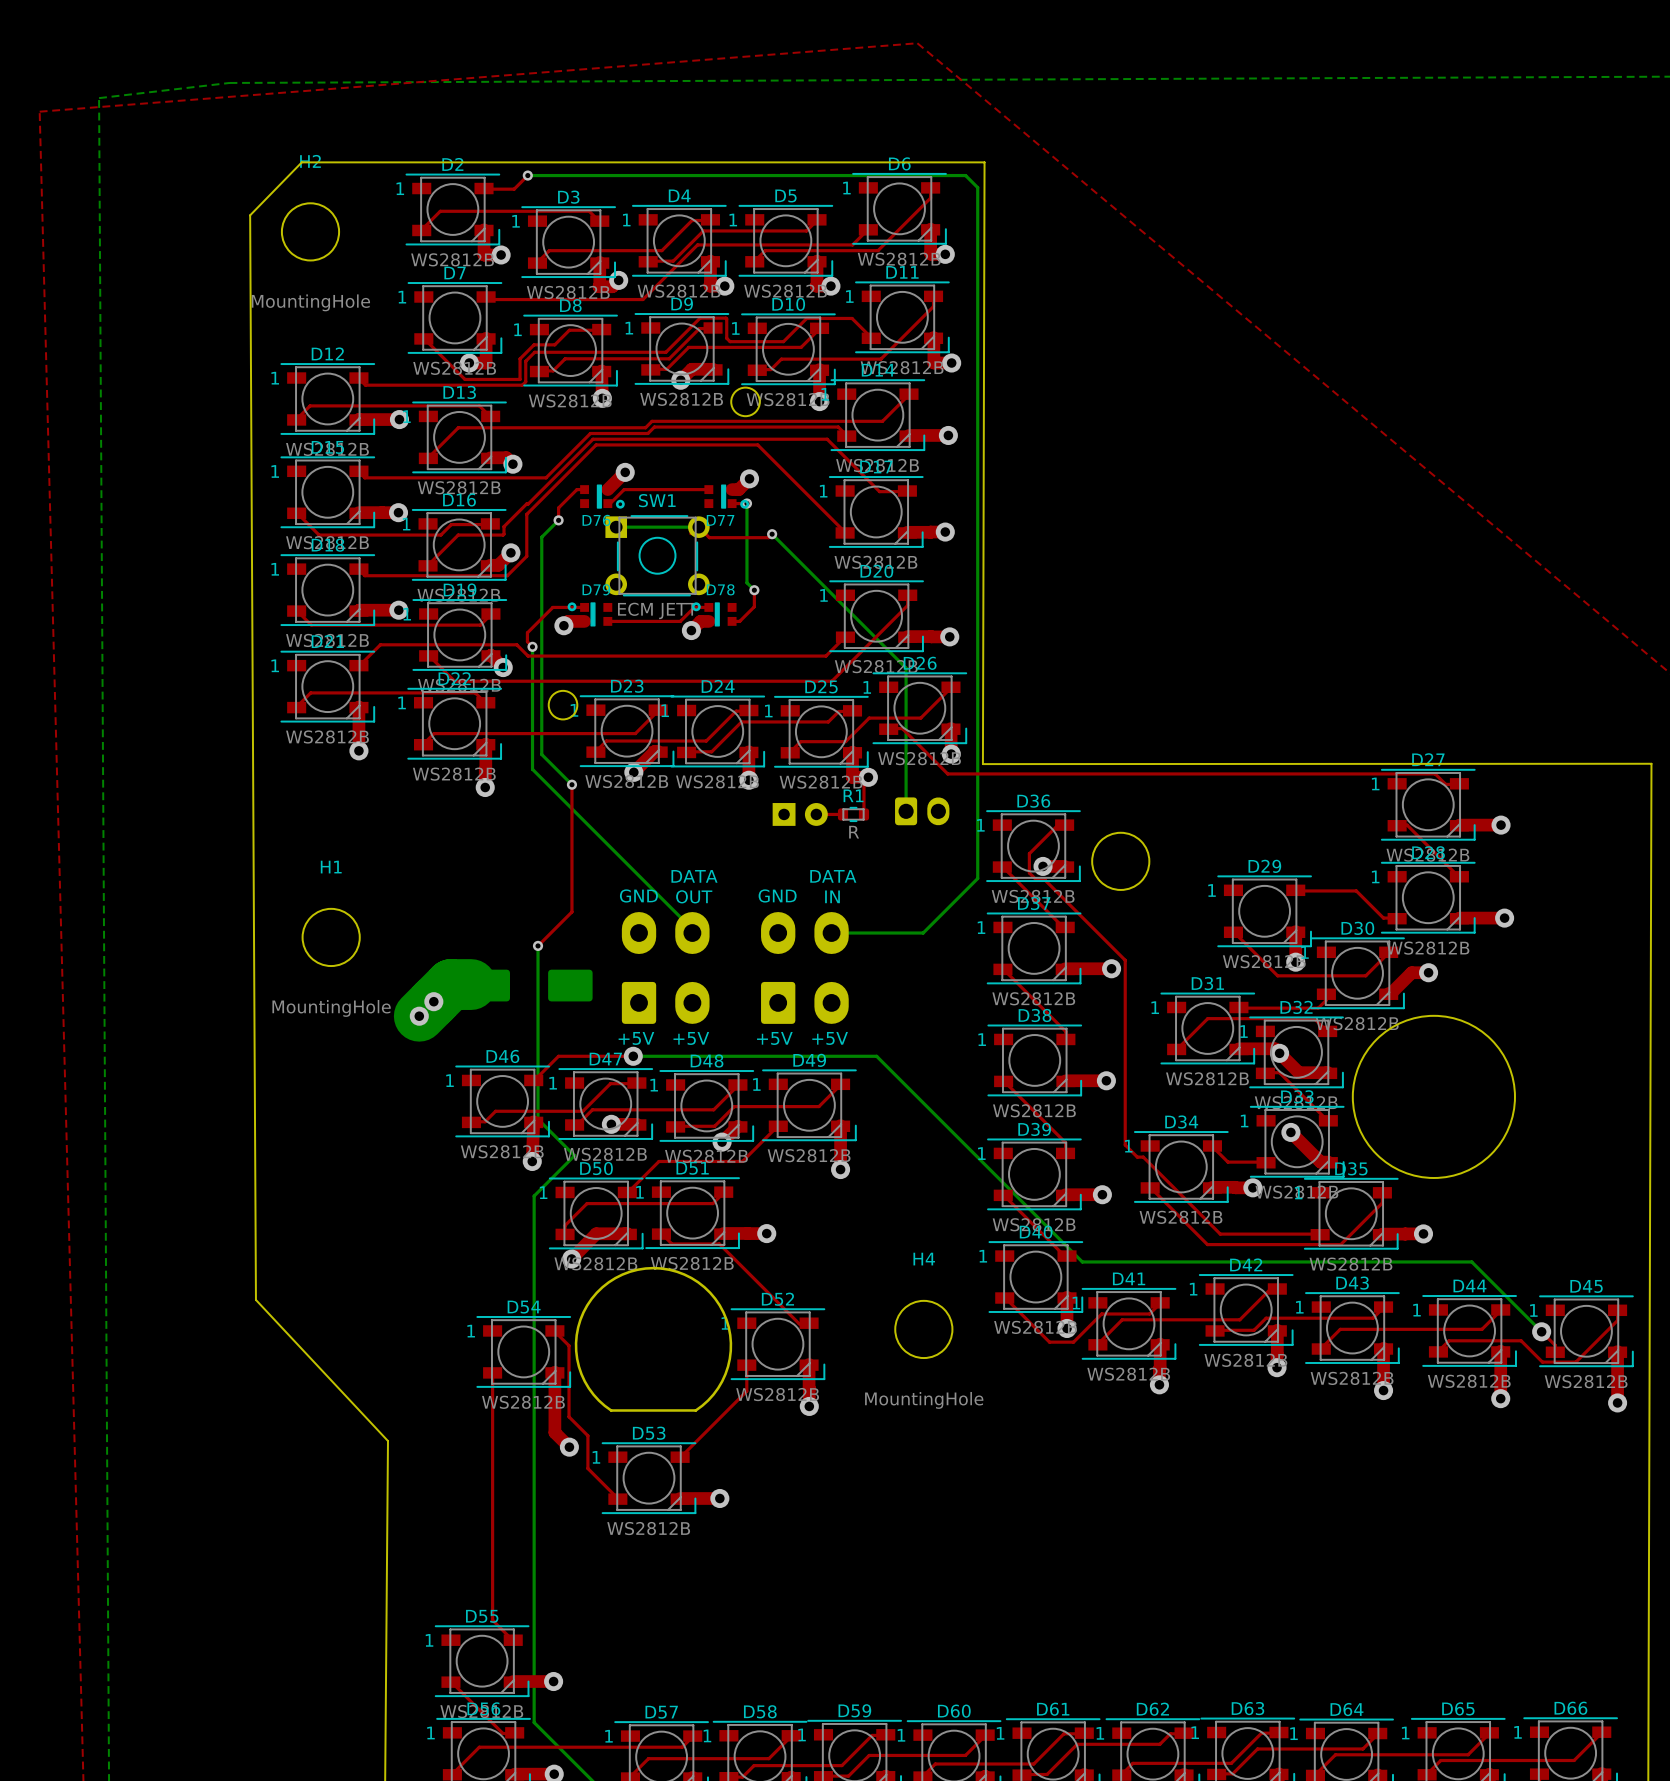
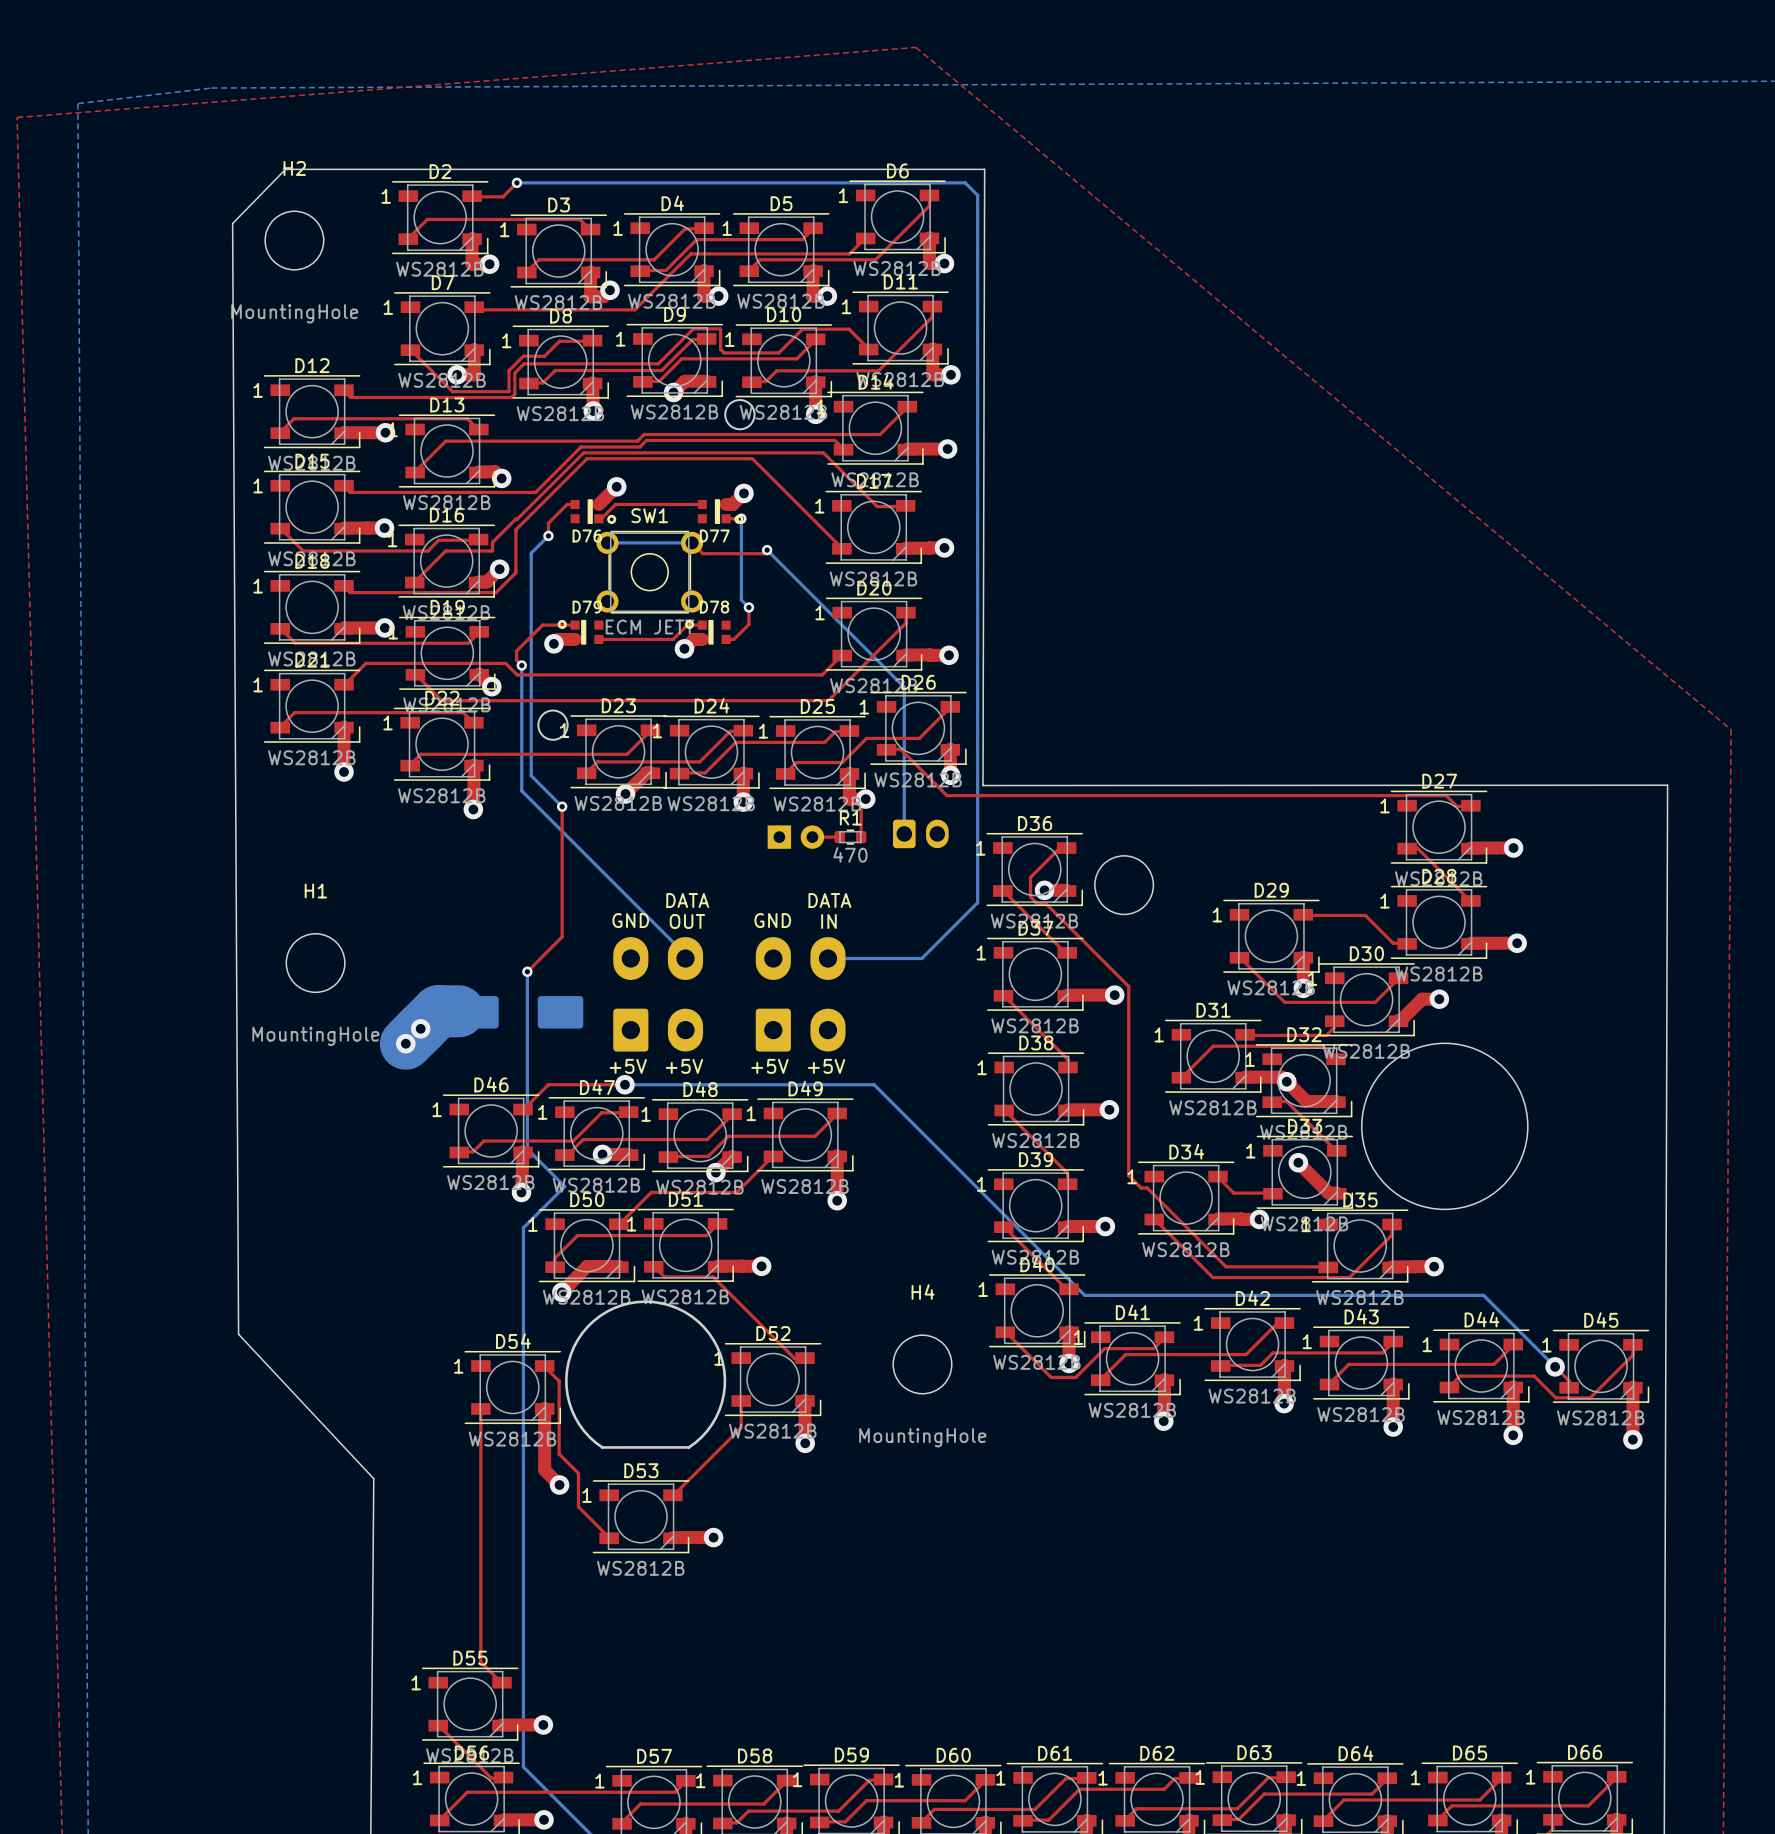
SW1 footprint: [605, 515, 710, 597] -> [596, 530, 704, 614]
R1 value: R (854, 832) -> 470 (850, 854)

